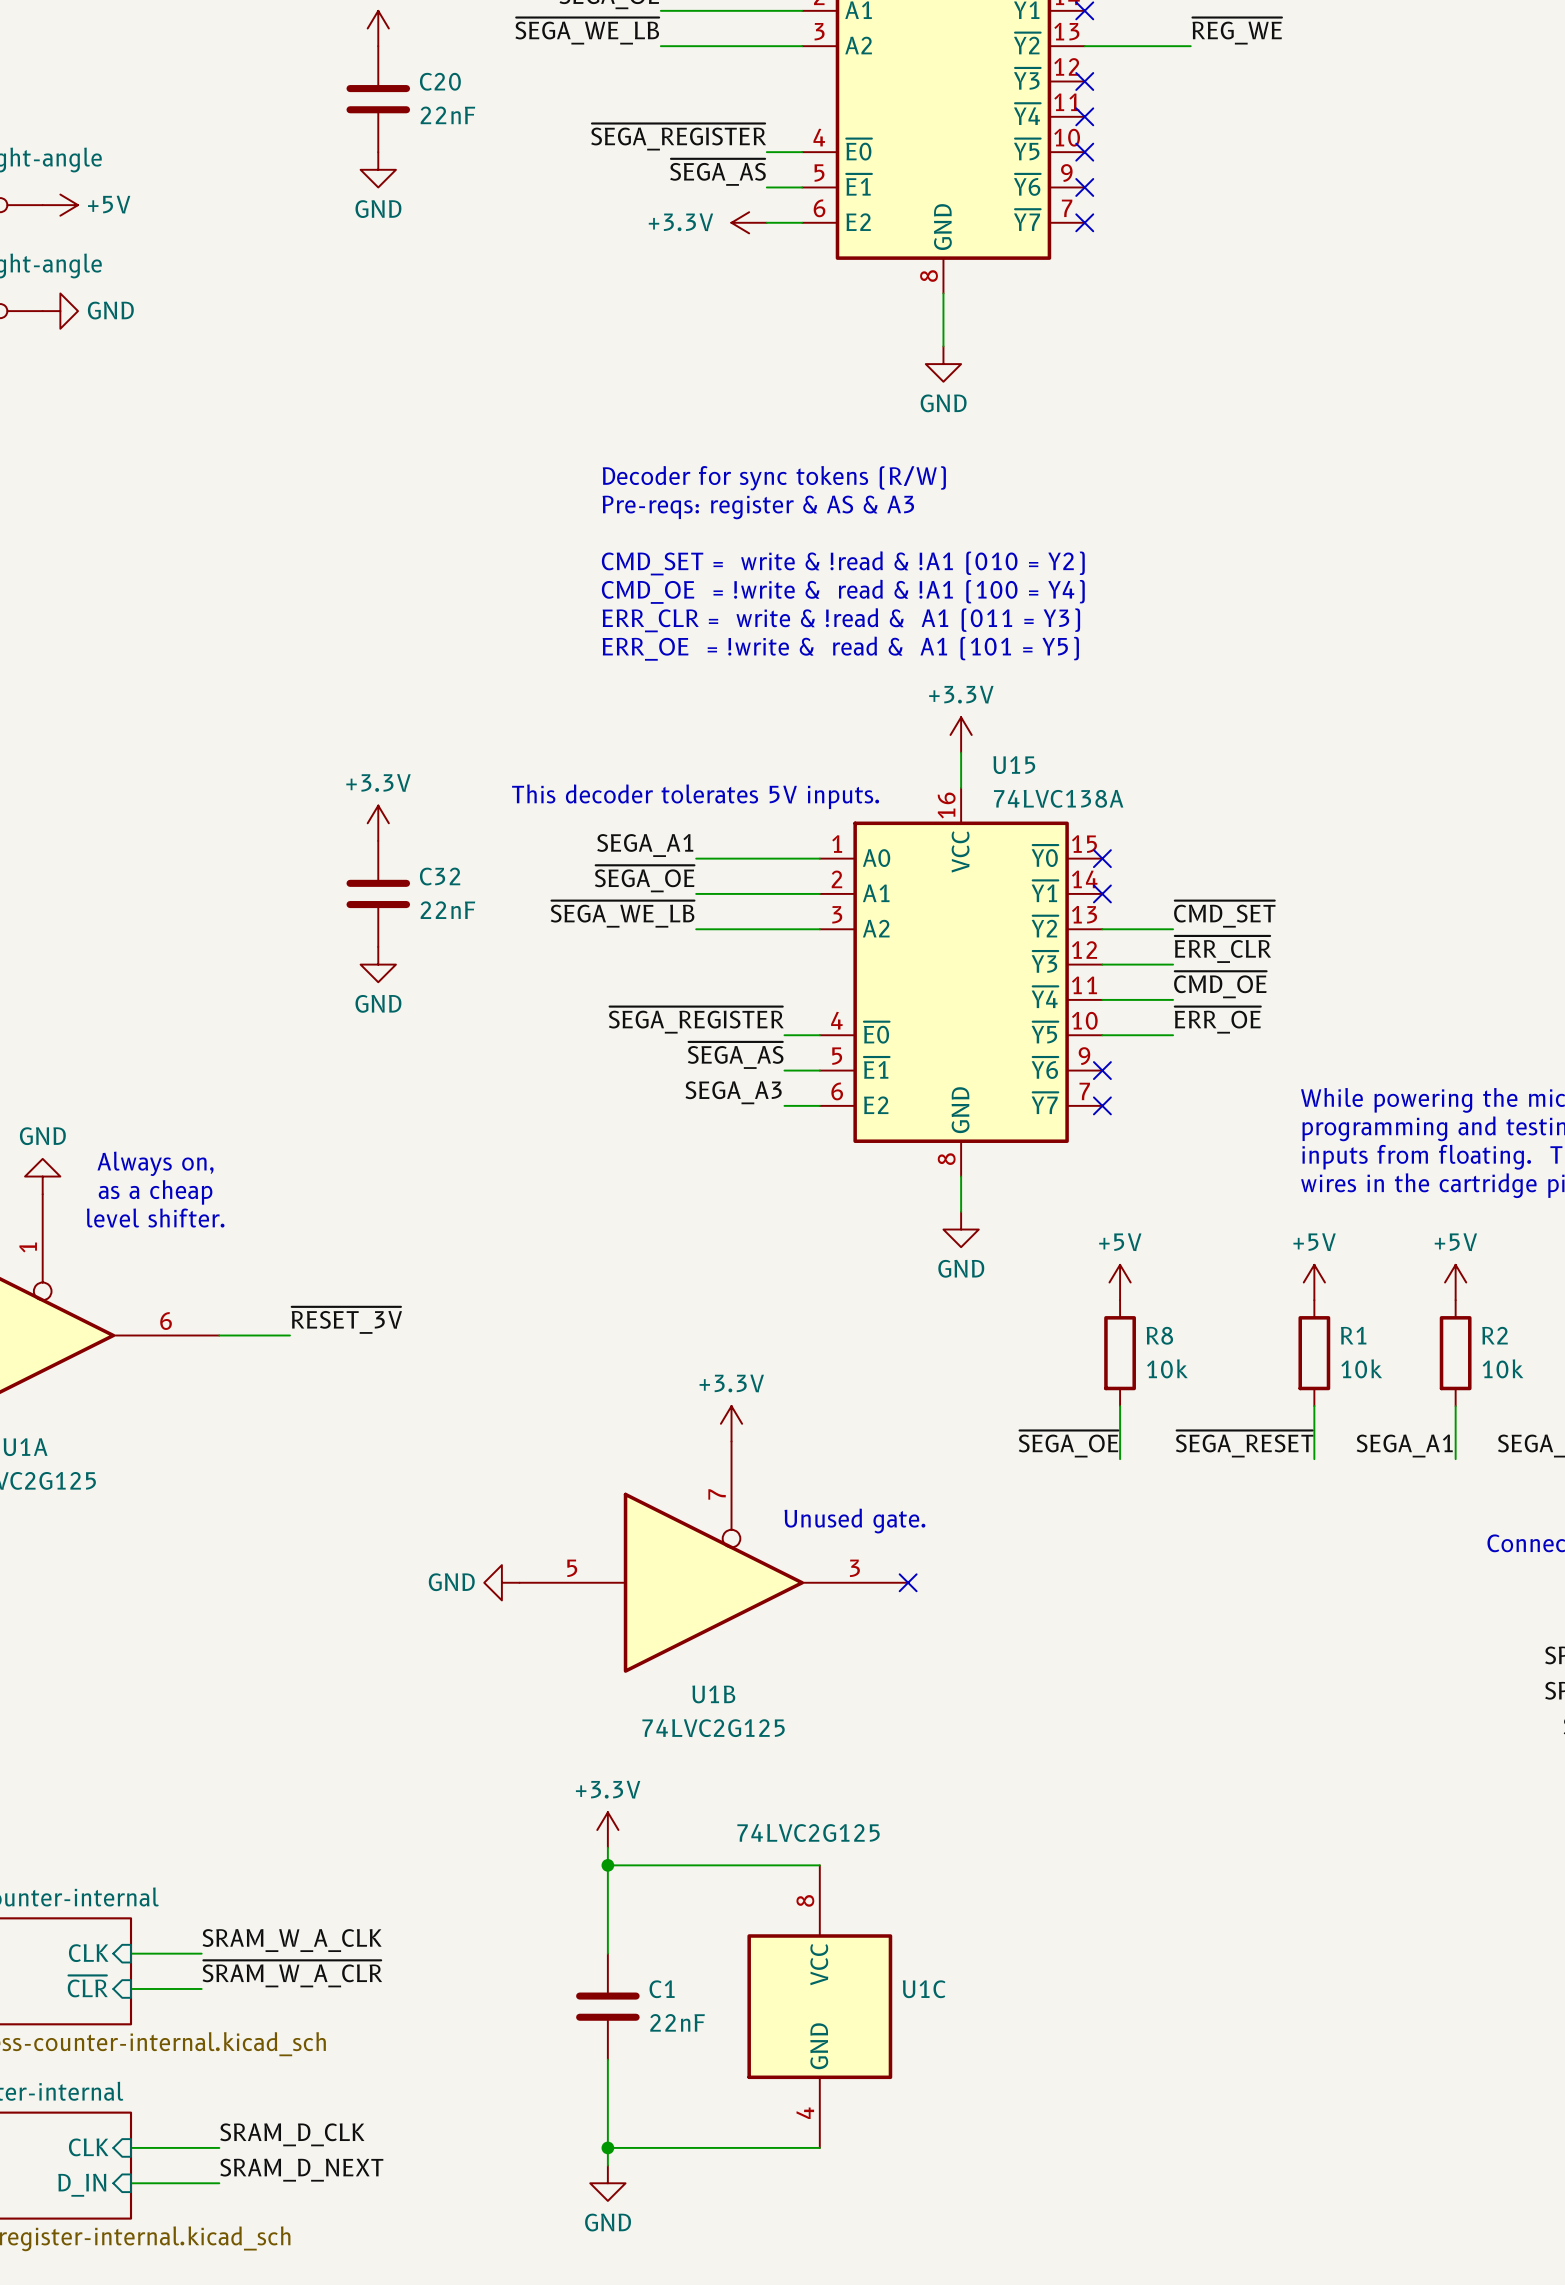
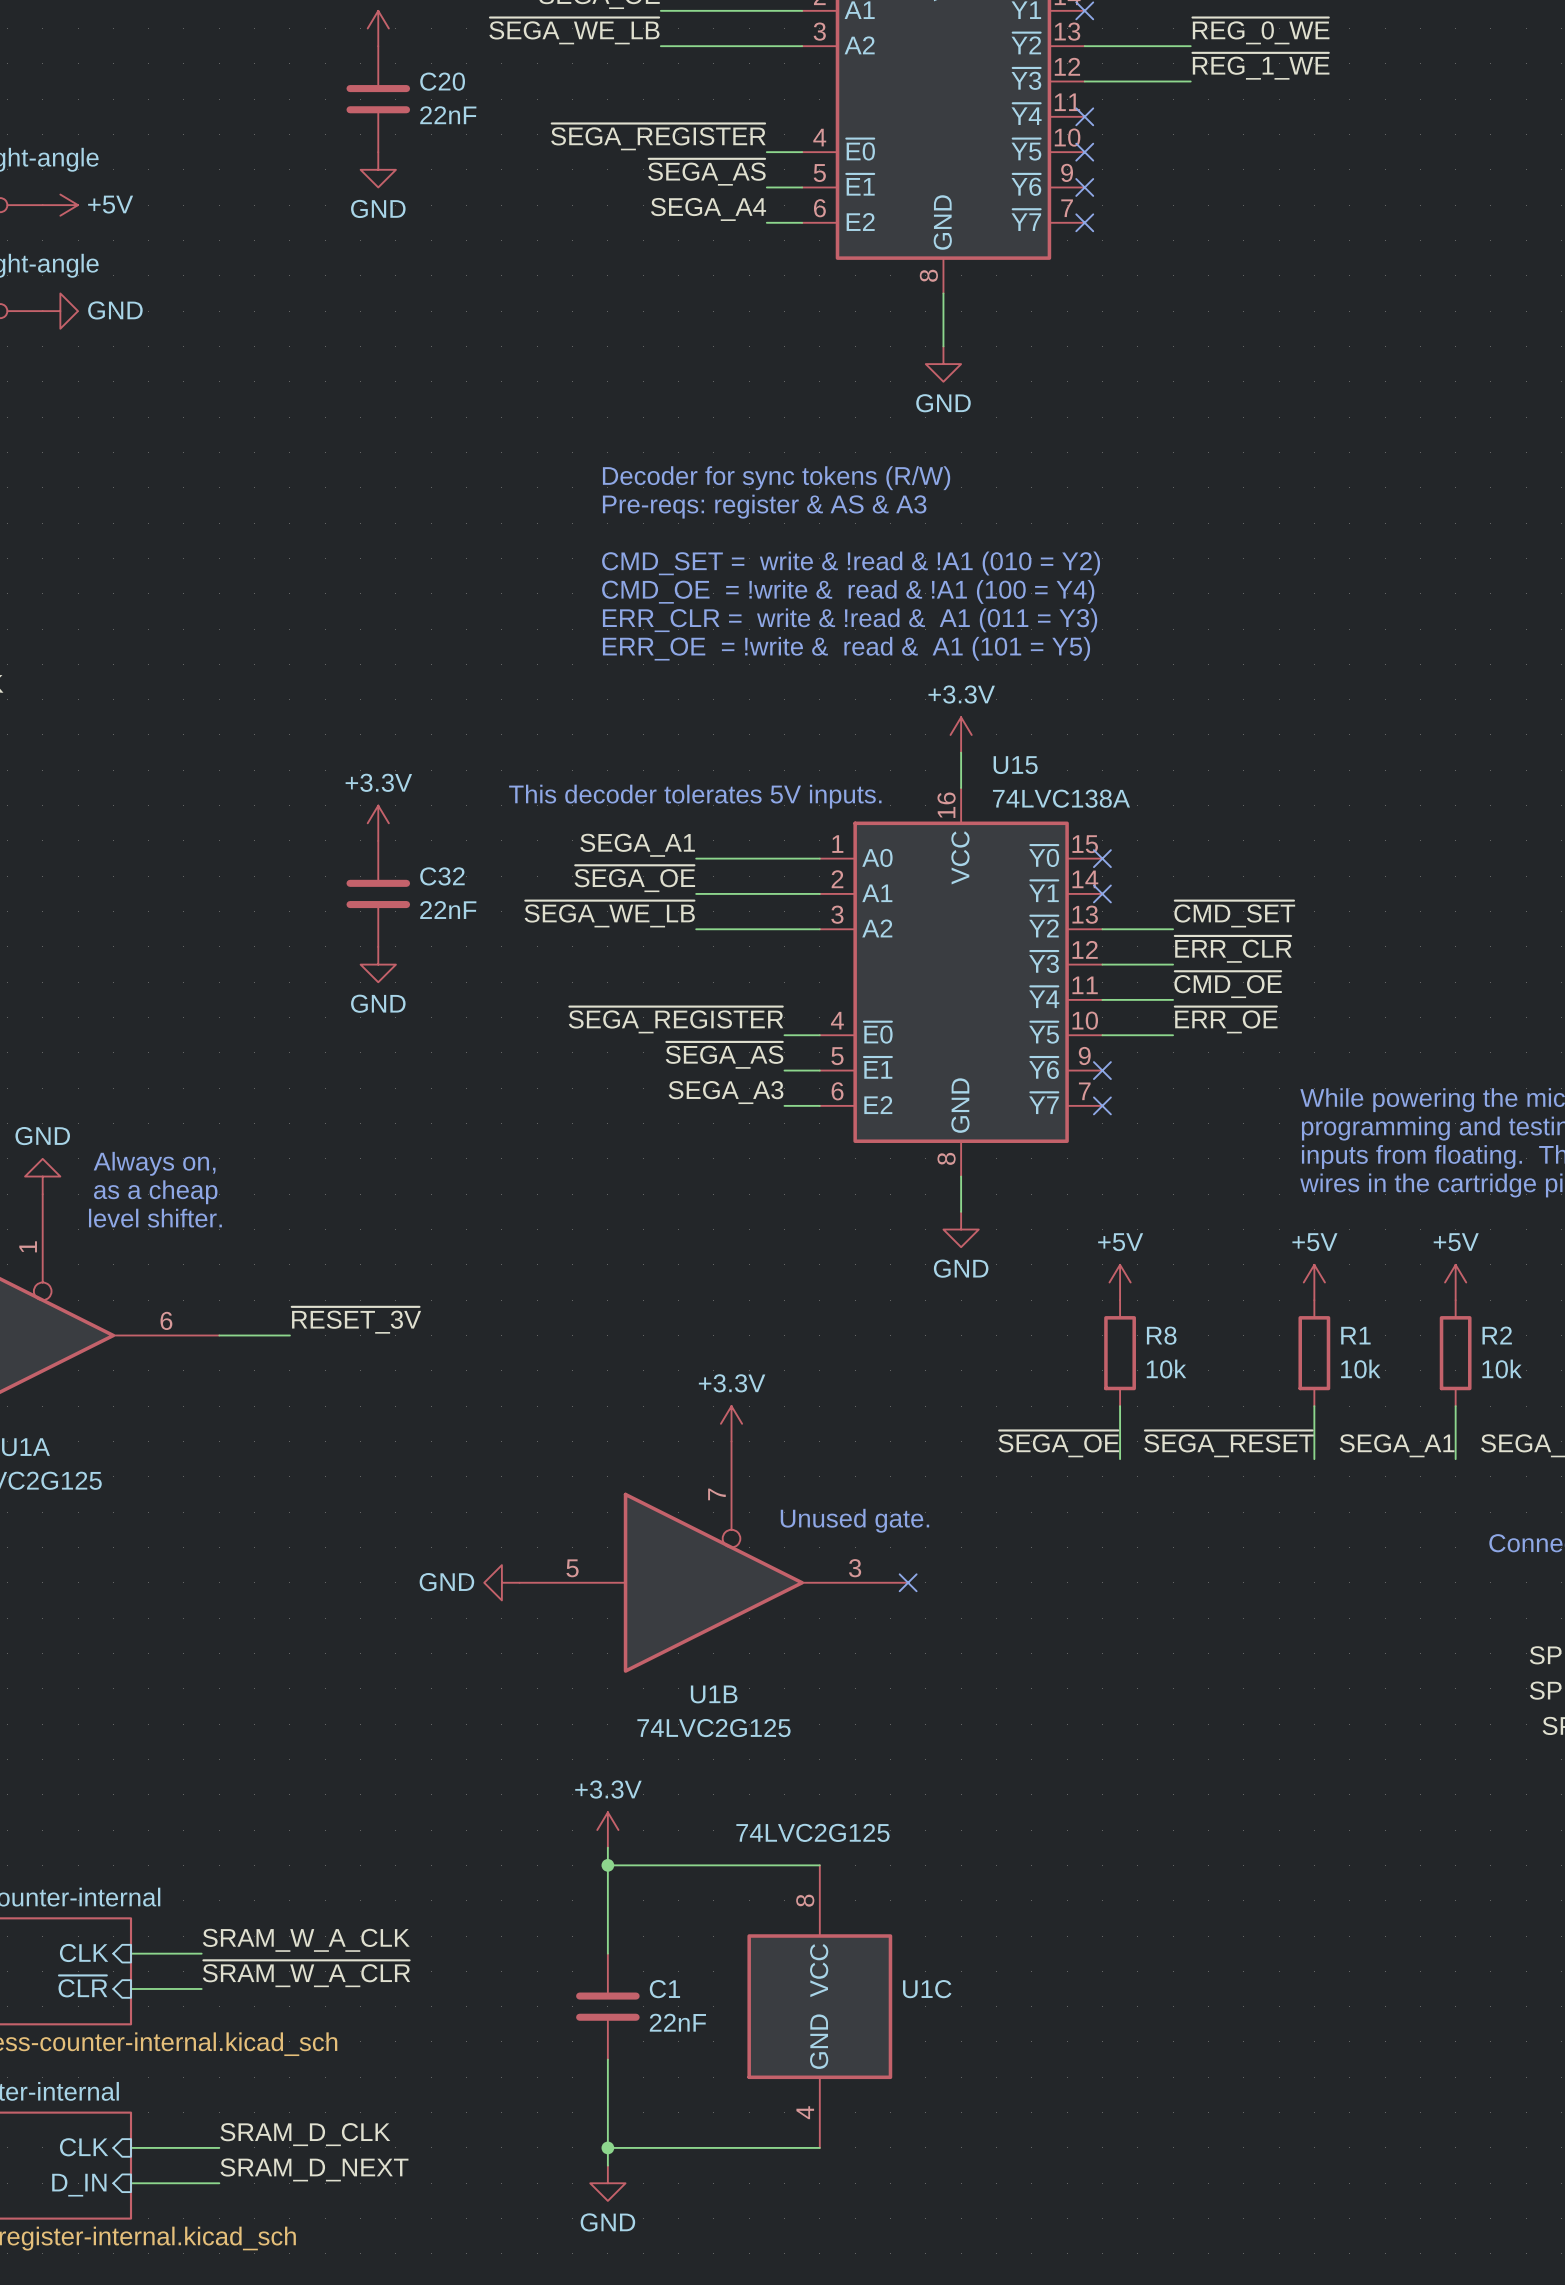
label: ~{REG_WE} (1237, 31) -> ~{REG_0_WE} (1260, 30)
label: none -> ~{REG_1_WE} (1260, 66)
wire: none -> (1084, 81) (1190, 81)
no-connect mark: (1084, 81) -> none
label: none -> SEGA_A4 (708, 209)
power symbol: +3.3V (749, 222) -> none

